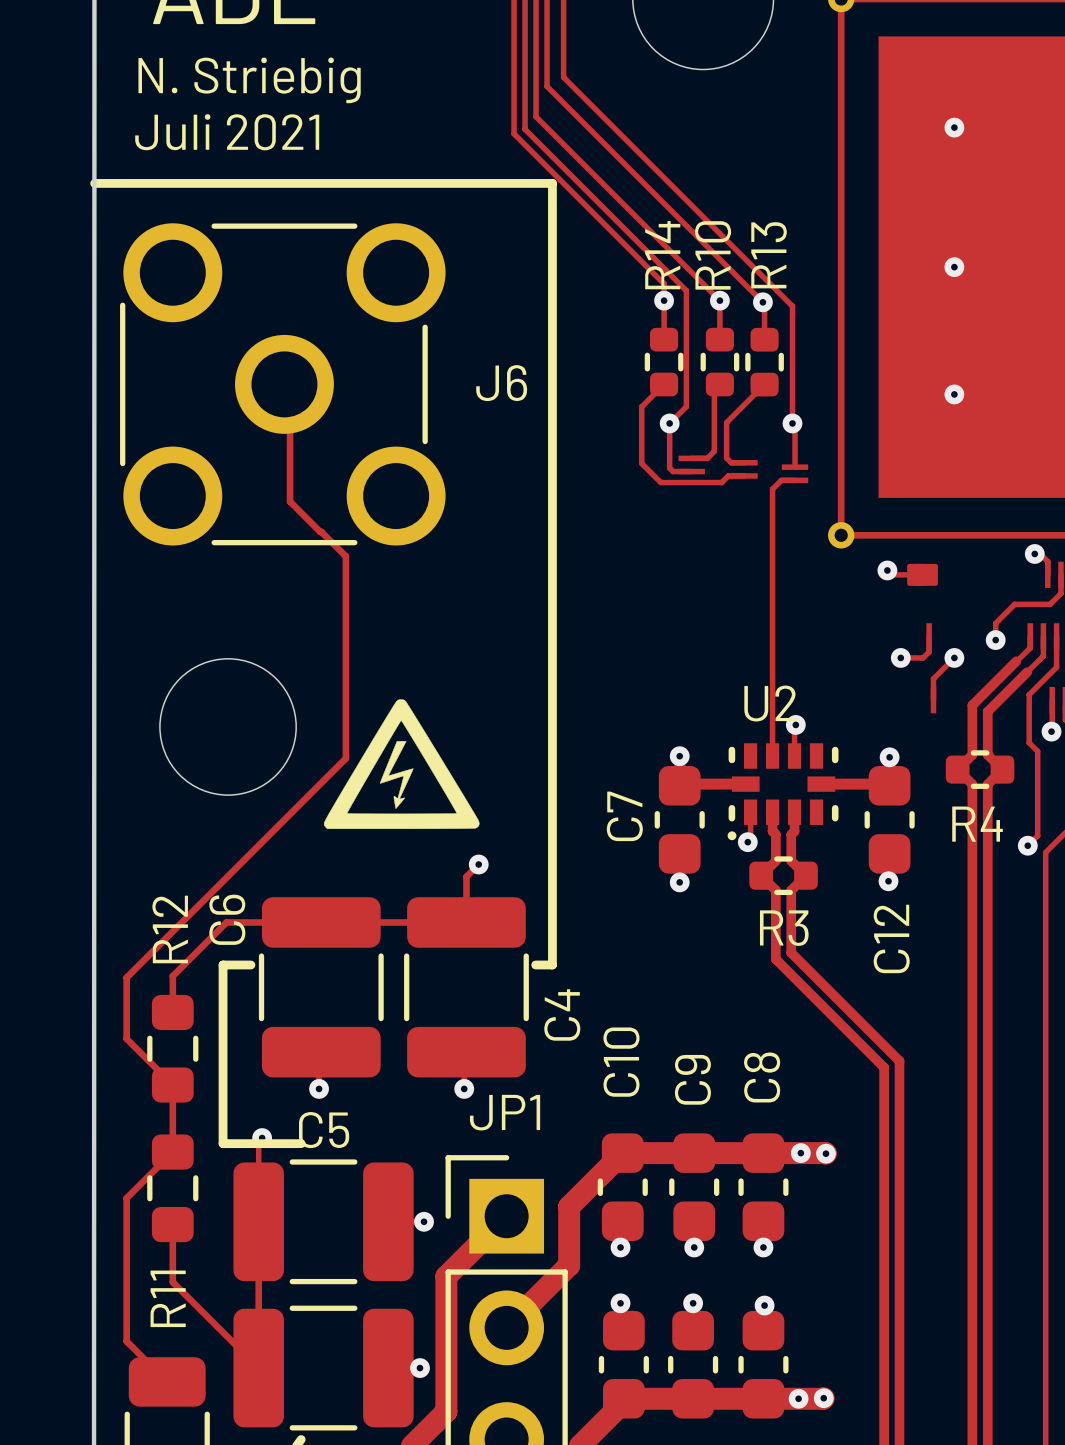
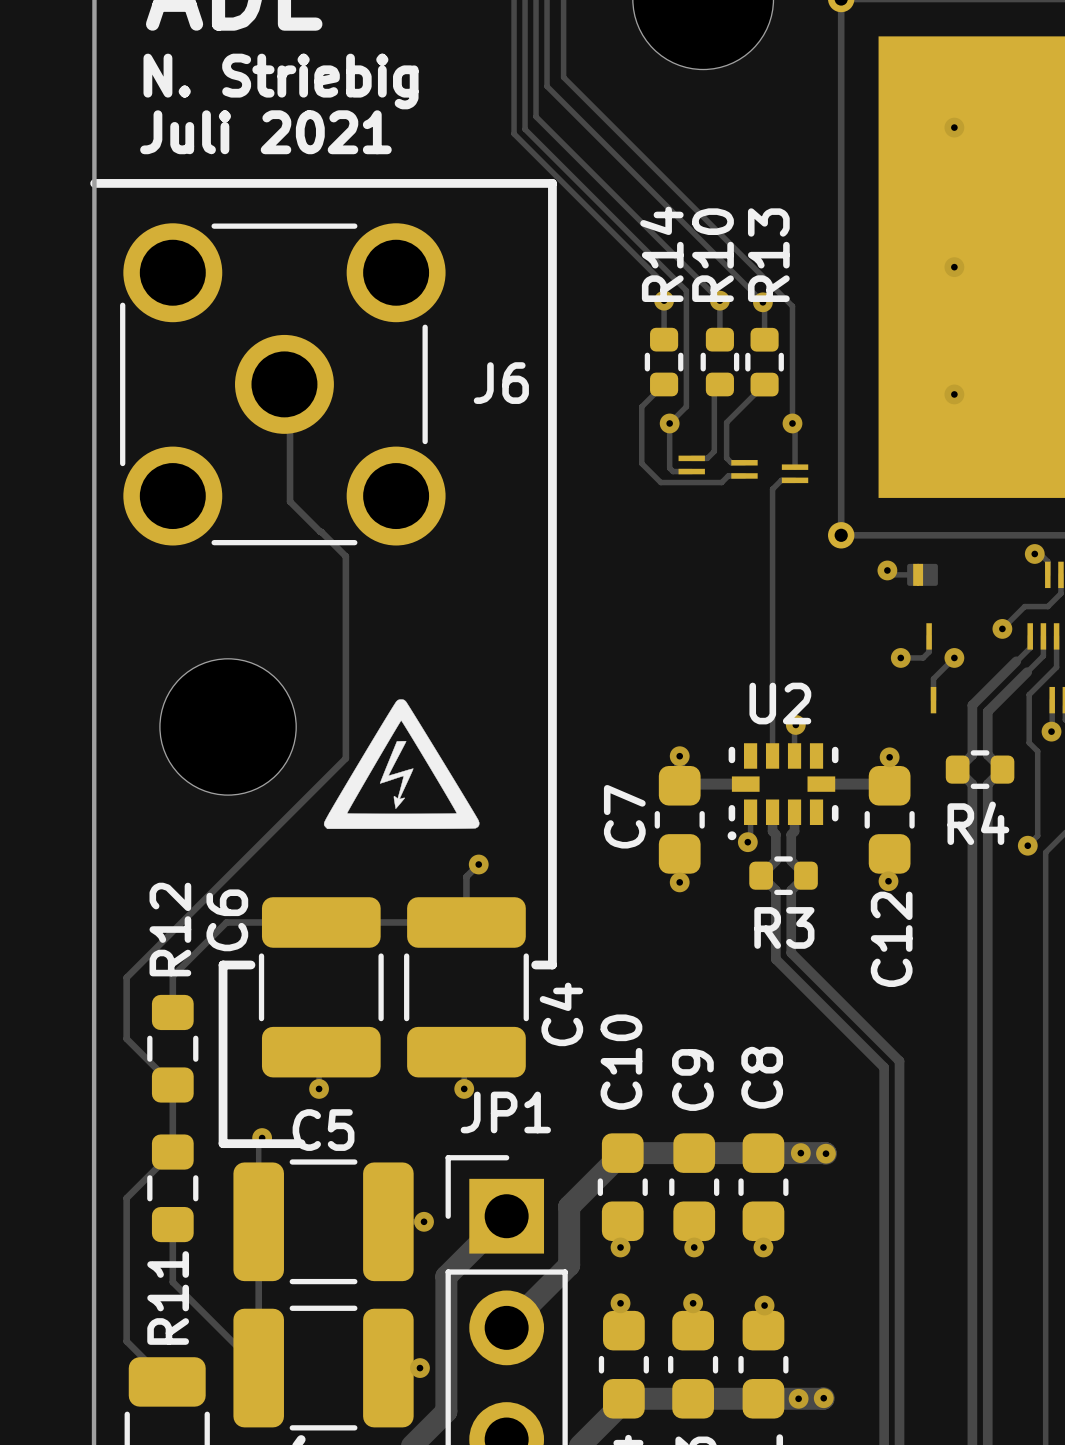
track: (1050, 604) (1014, 604) (995, 623) (995, 640) -> (1050, 604) (1047, 606) (1024, 606) (1002, 628)
via position: (995, 640) -> (1002, 628)

